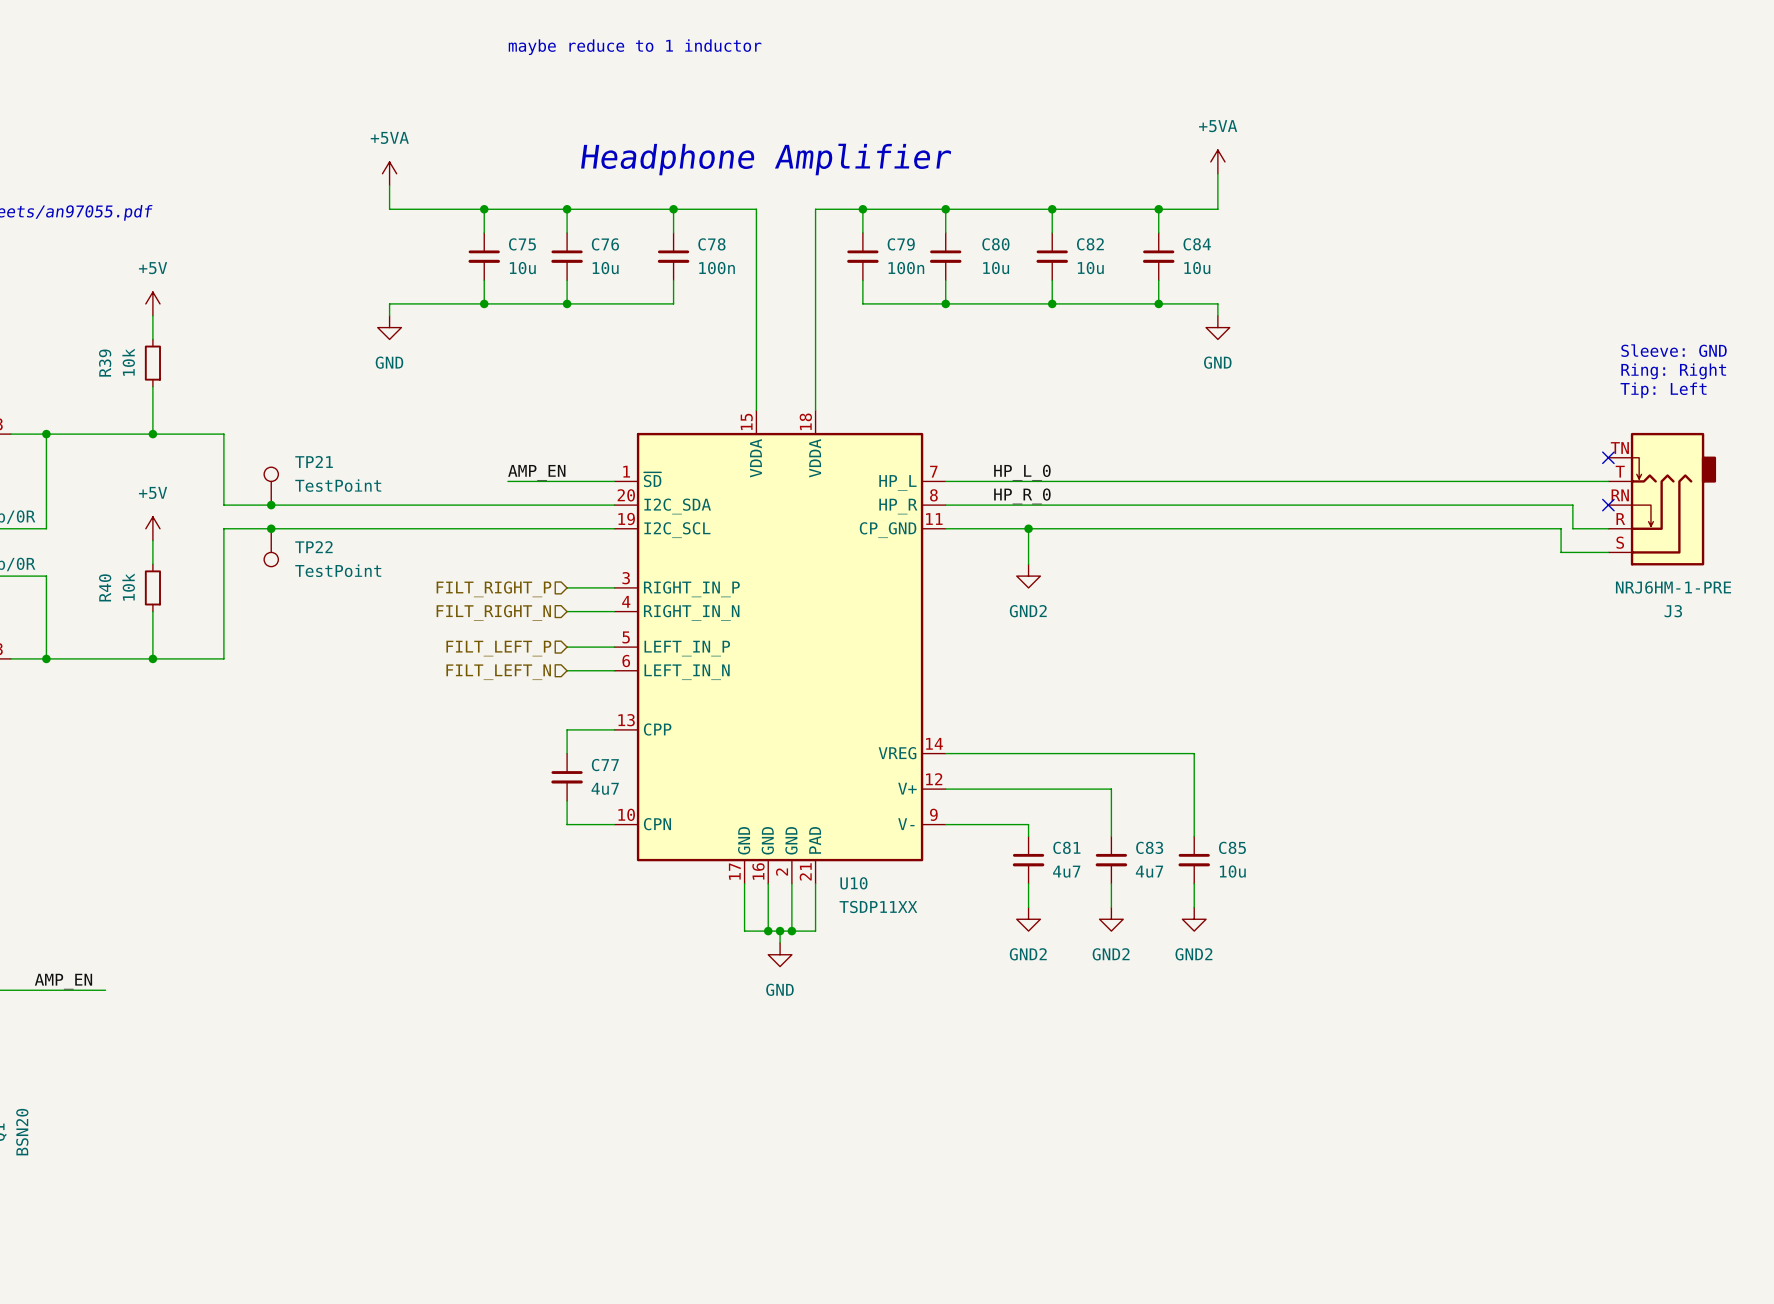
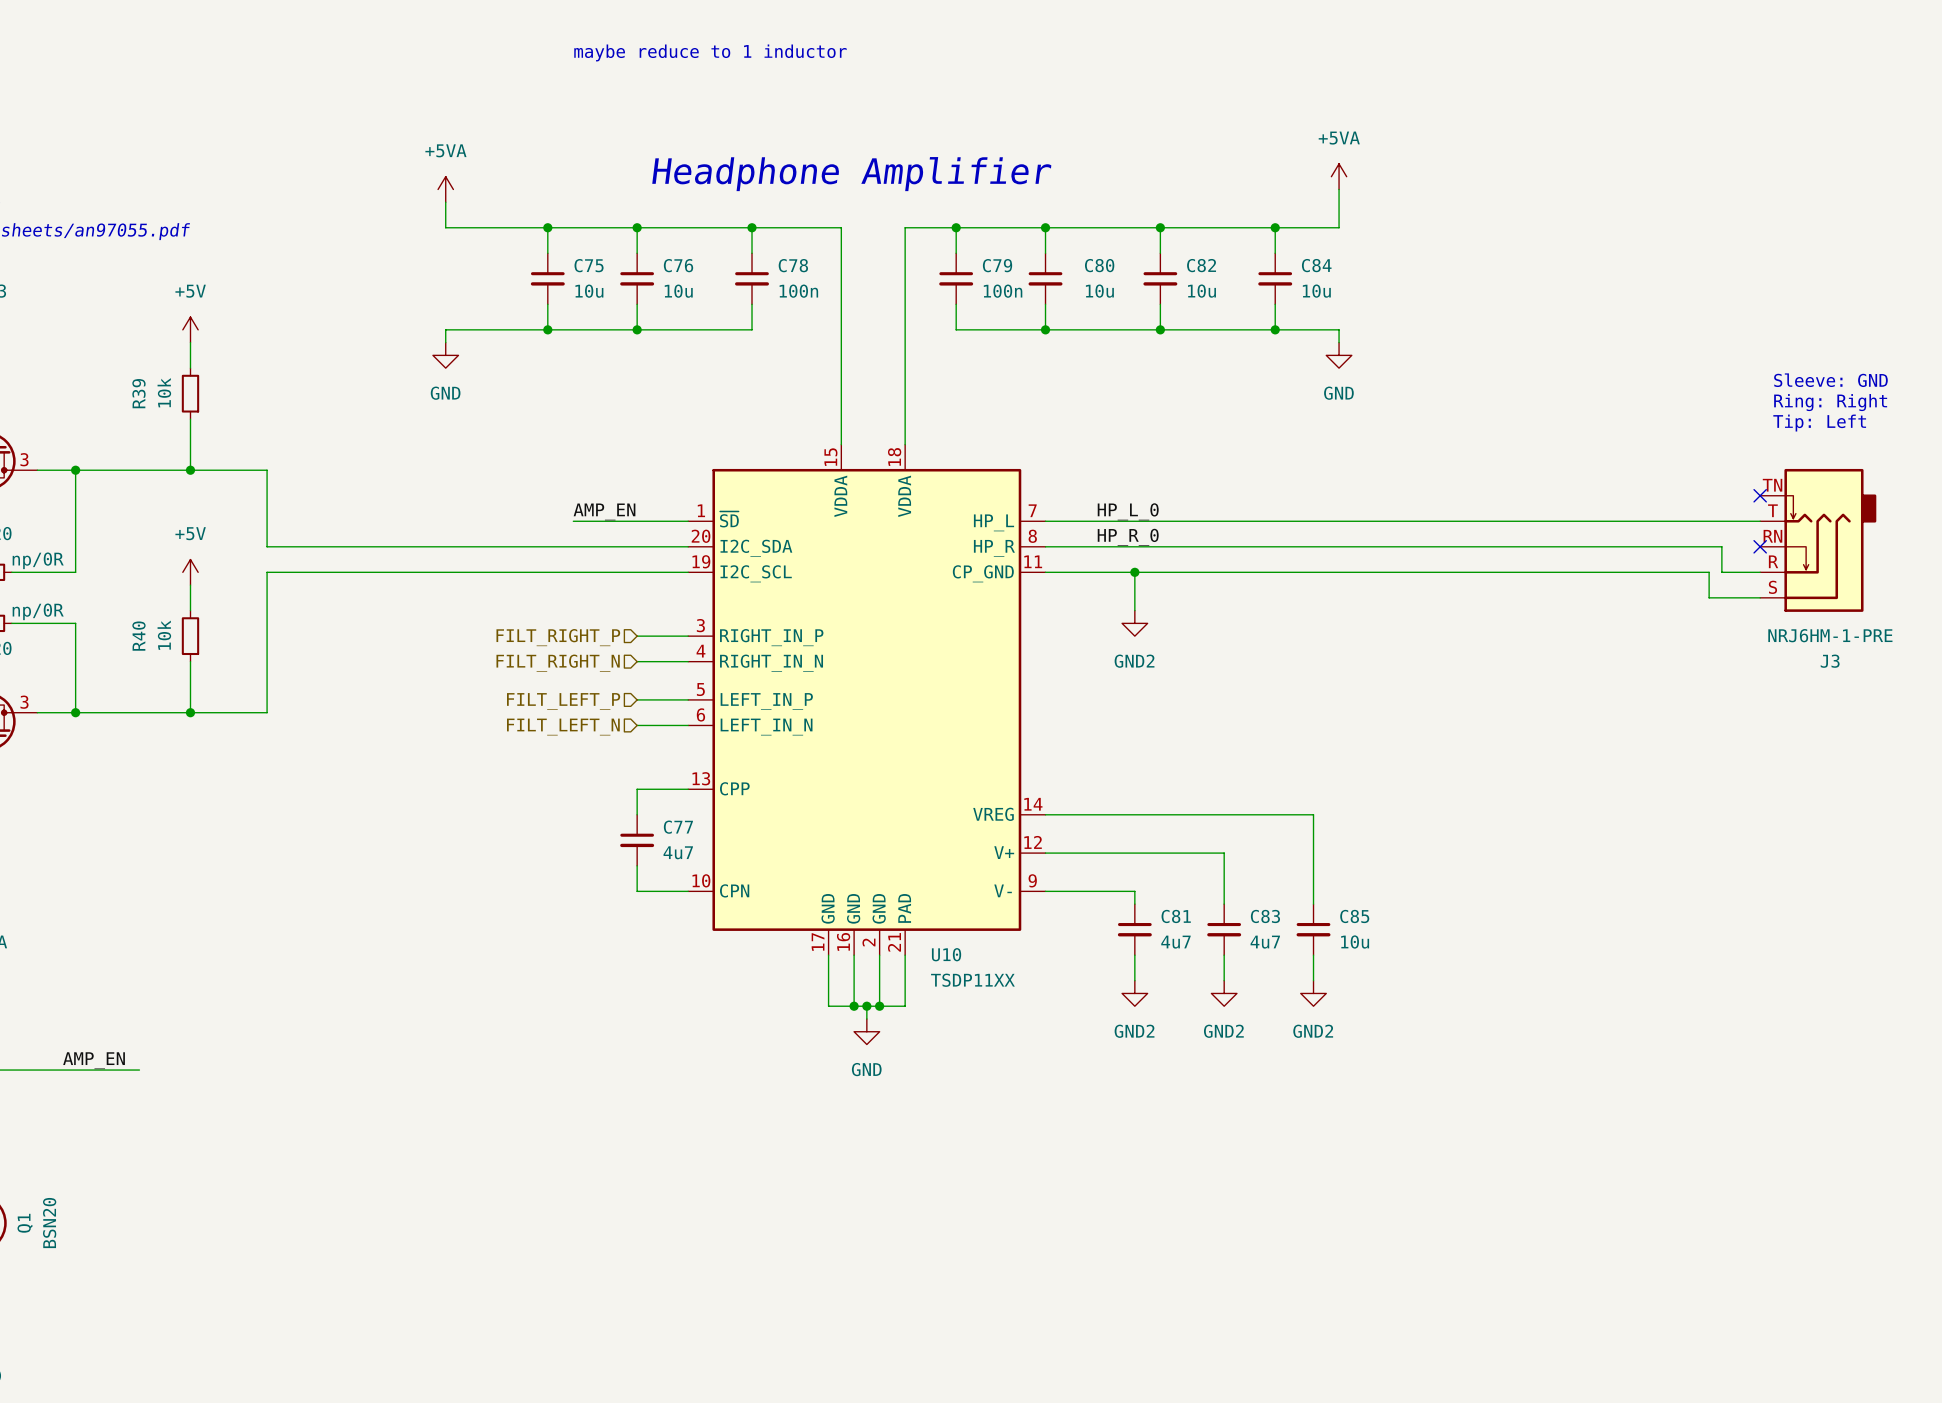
TP21: TestPoint (271, 486) -> none
junction: (271, 505) -> none
junction: (271, 528) -> none
TP22: TestPoint (271, 547) -> none

